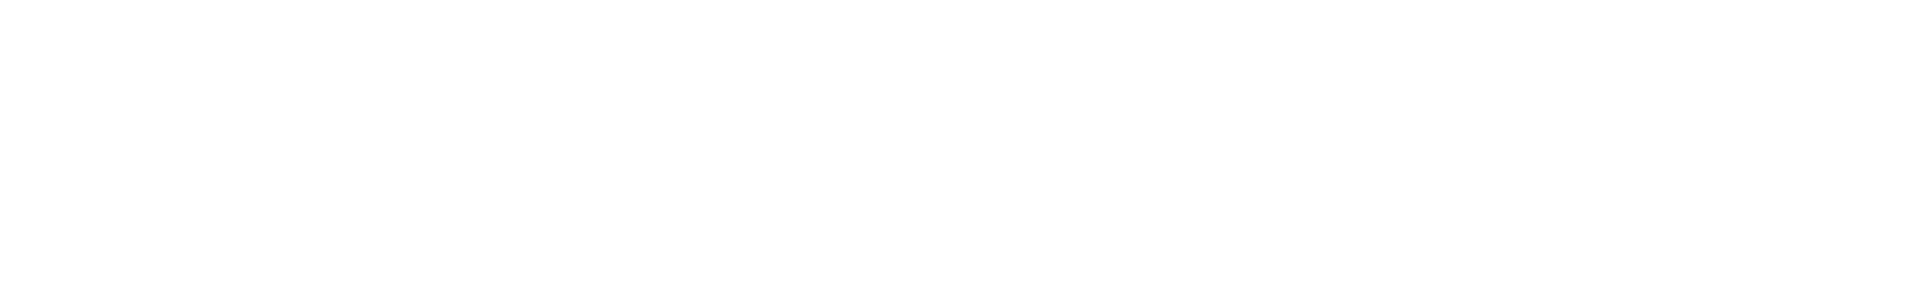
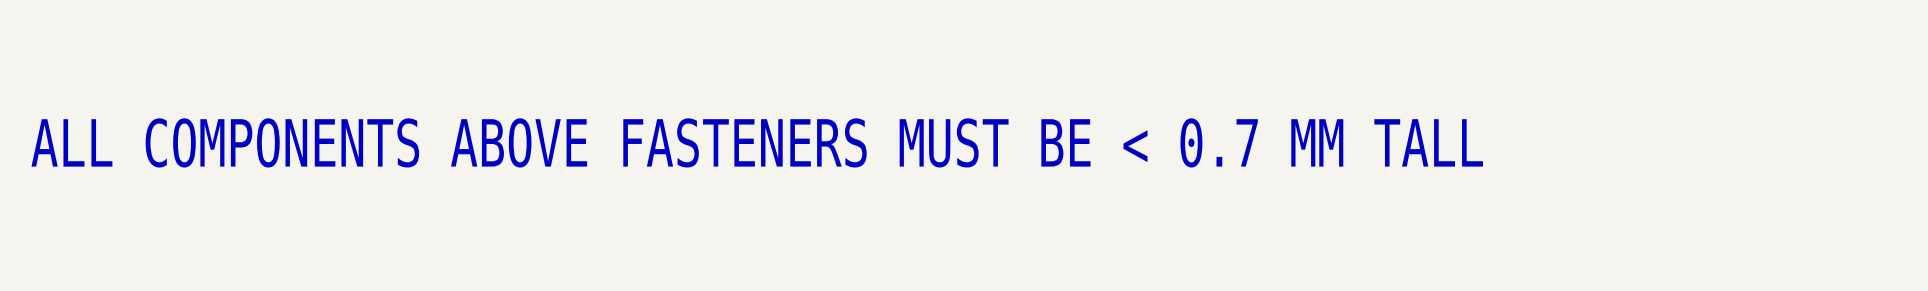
text: none -> ALL COMPONENTS ABOVE FASTENERS MUST BE < 0.7 MM TALL (757, 142)

